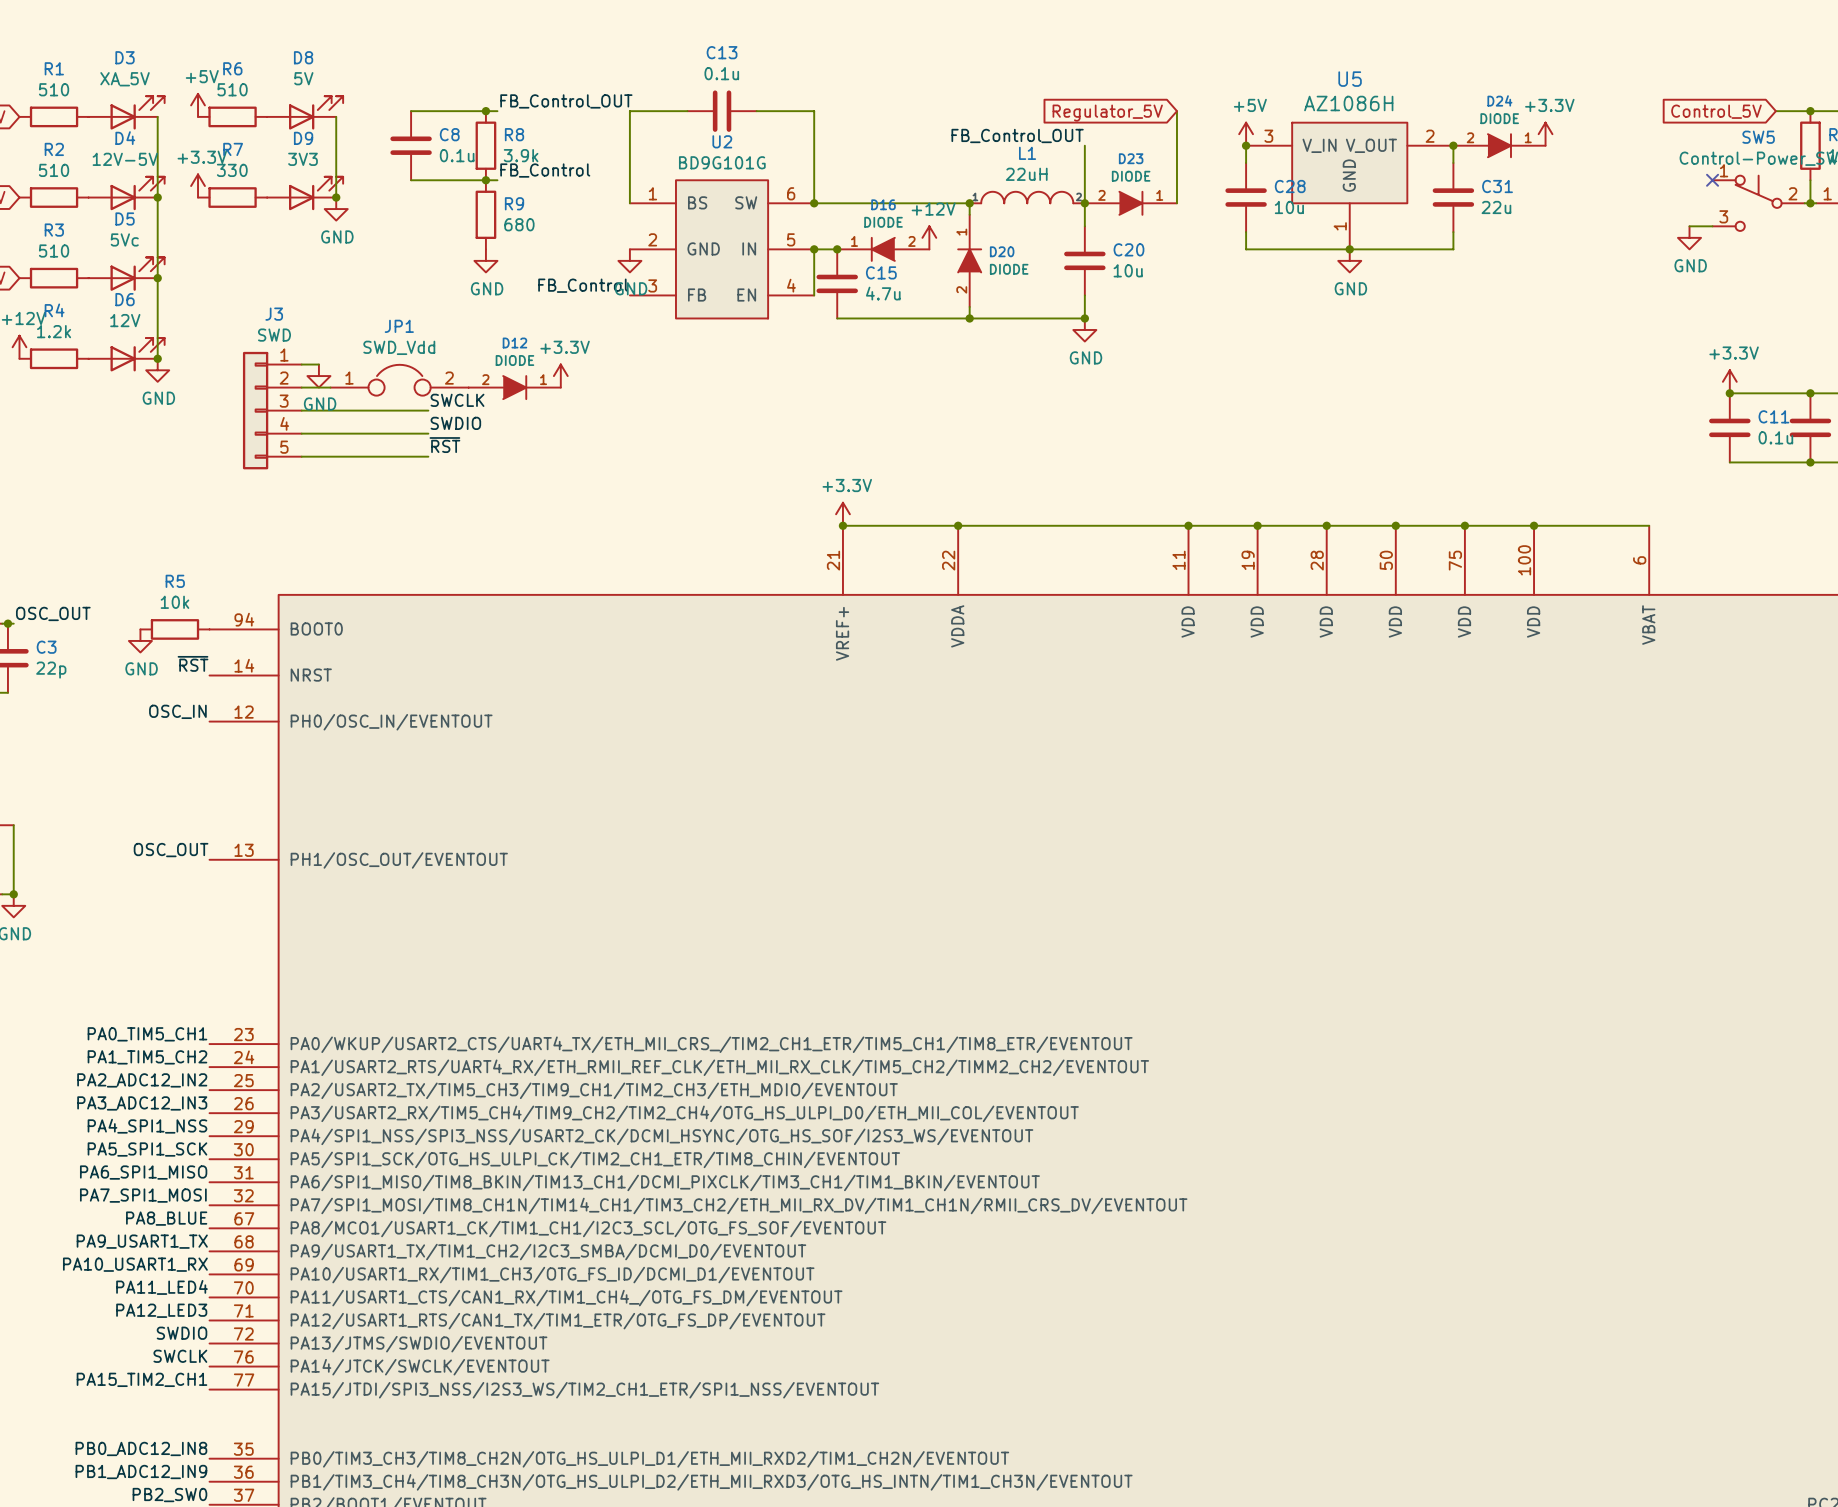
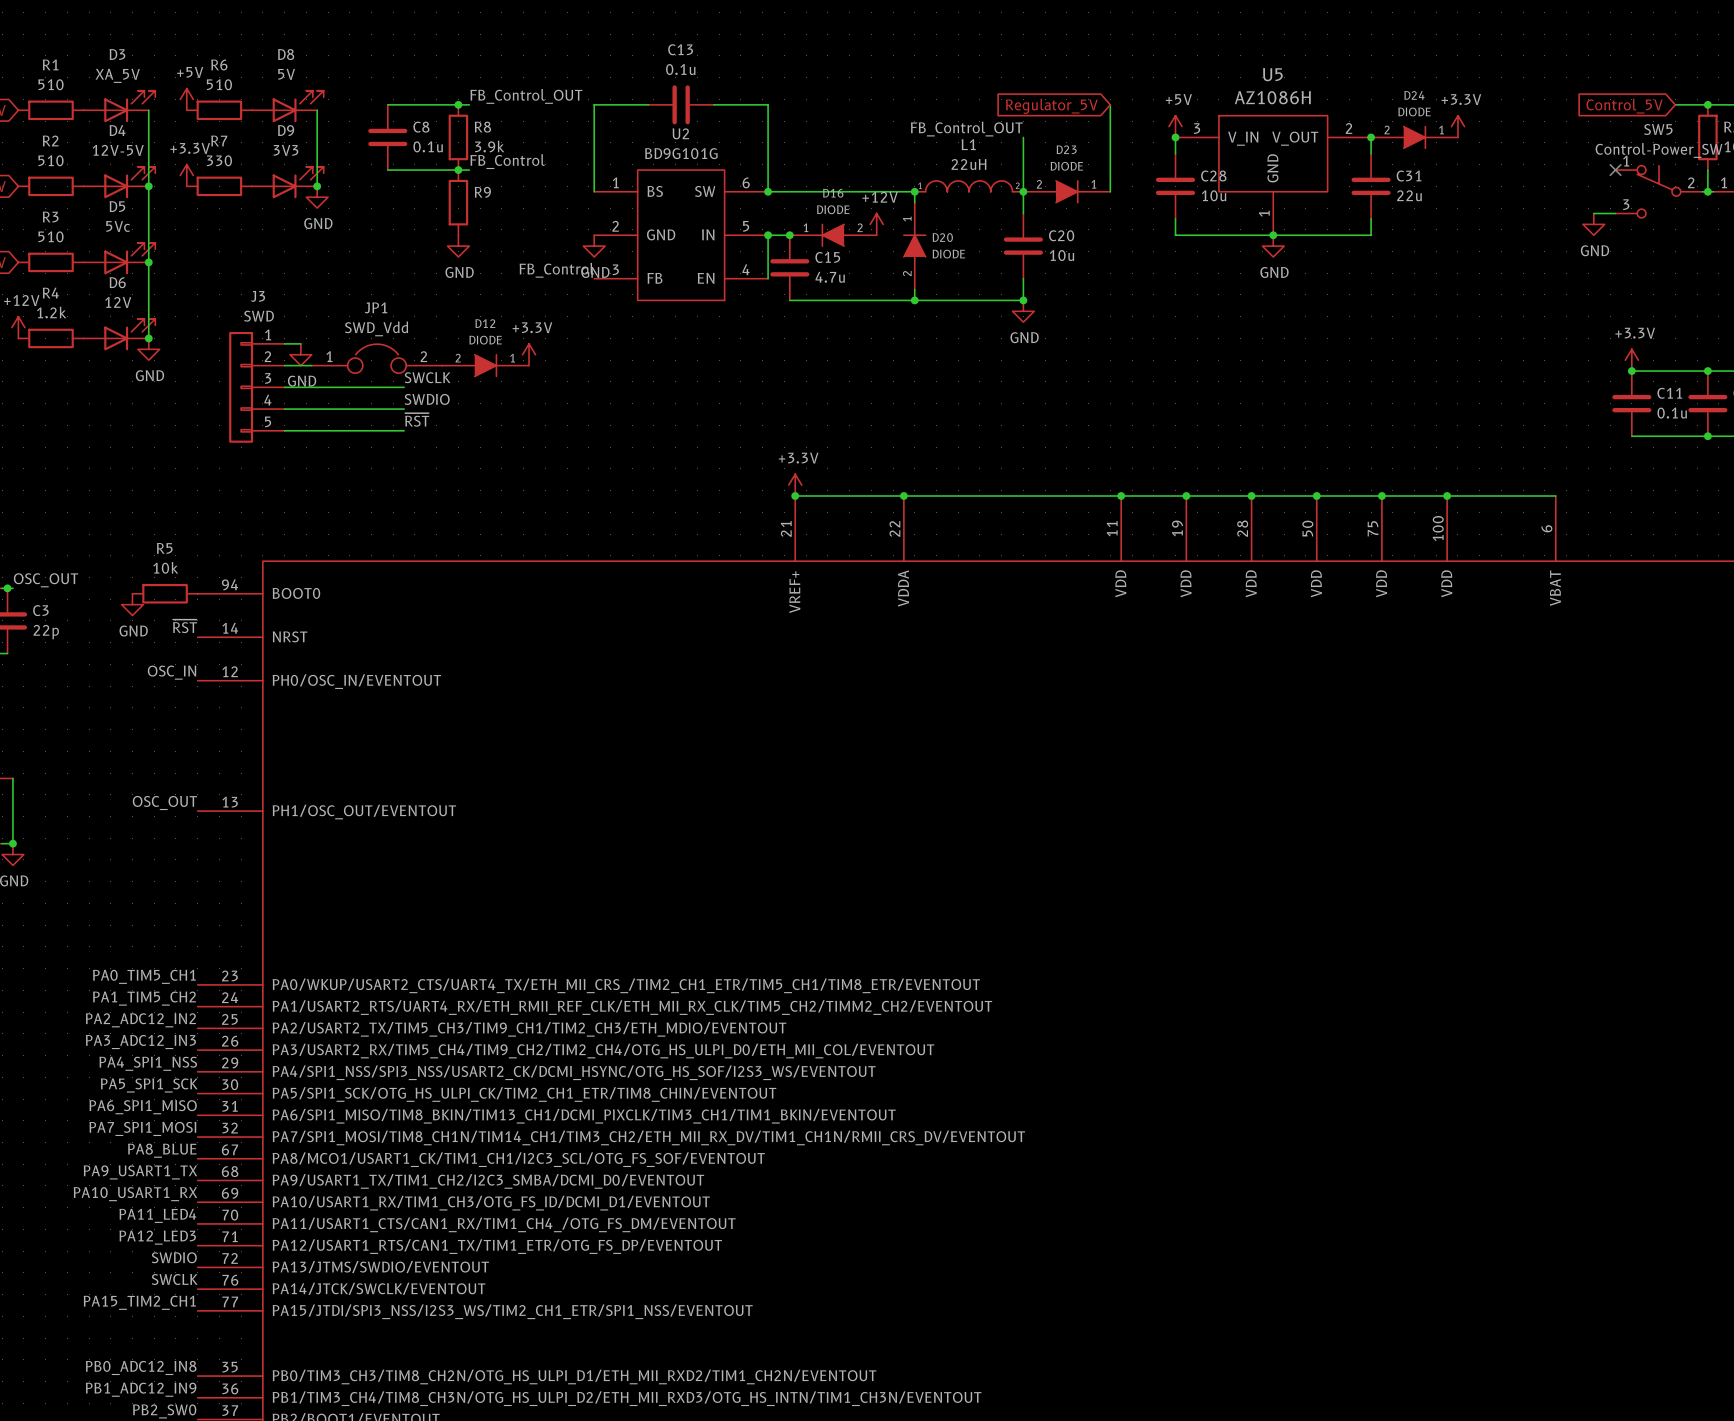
R9 value: 680 (519, 224) -> none

